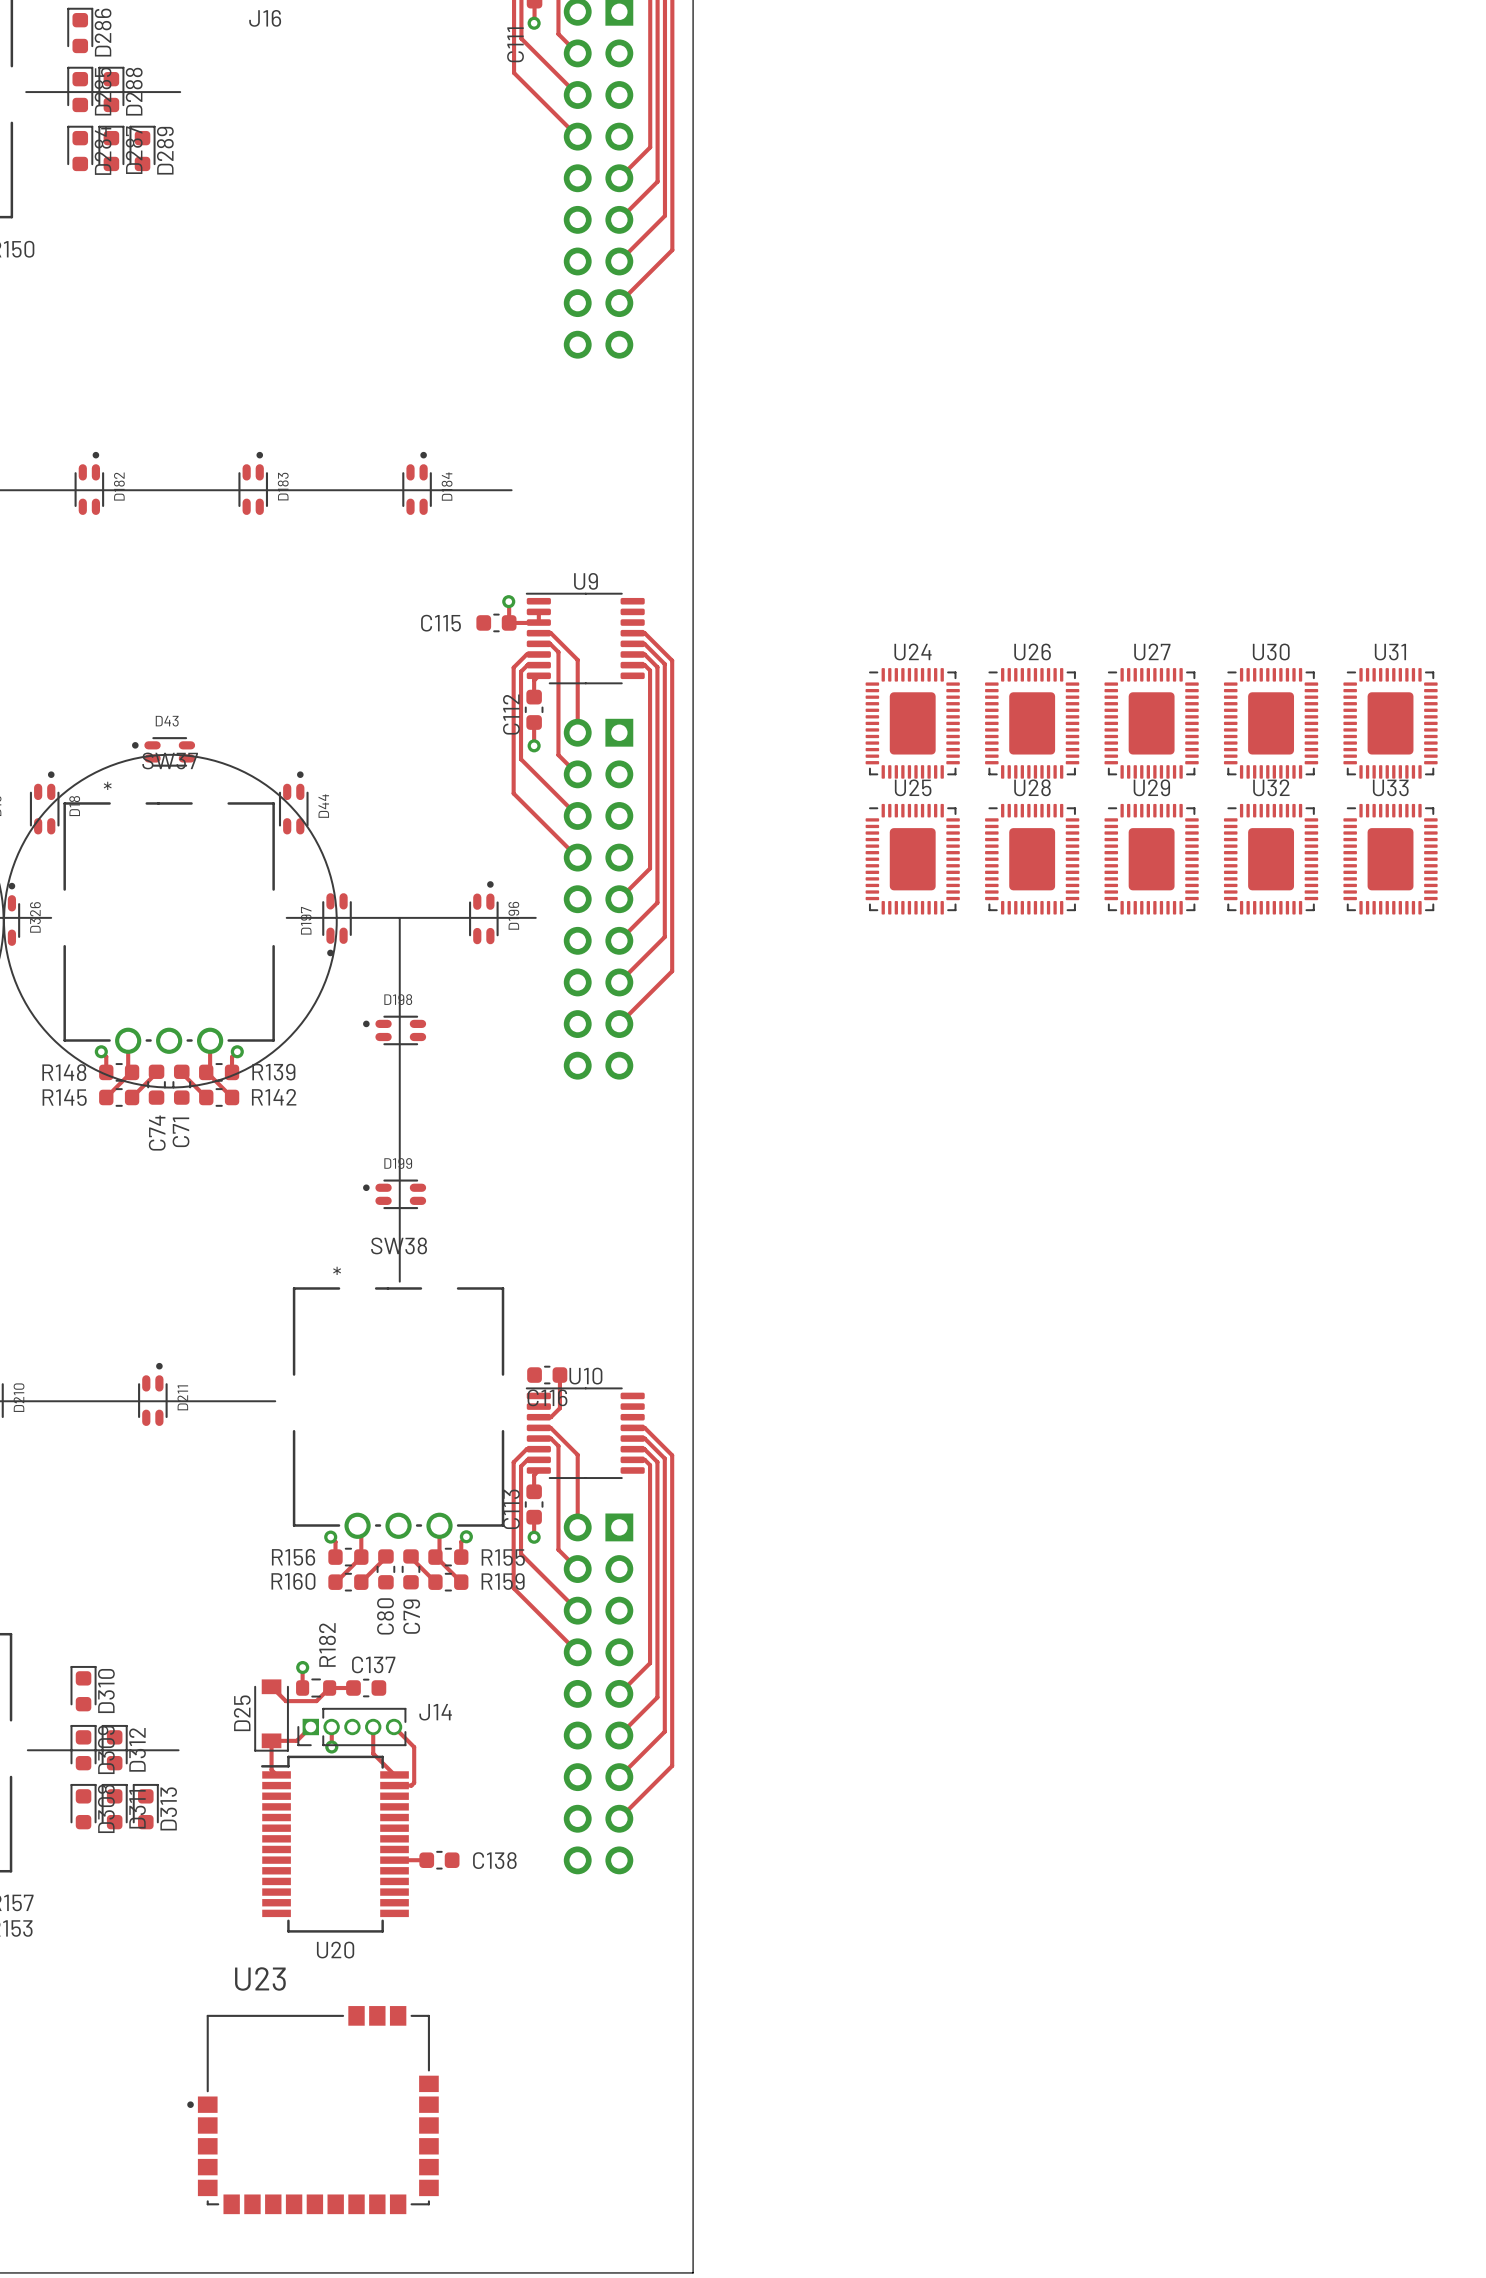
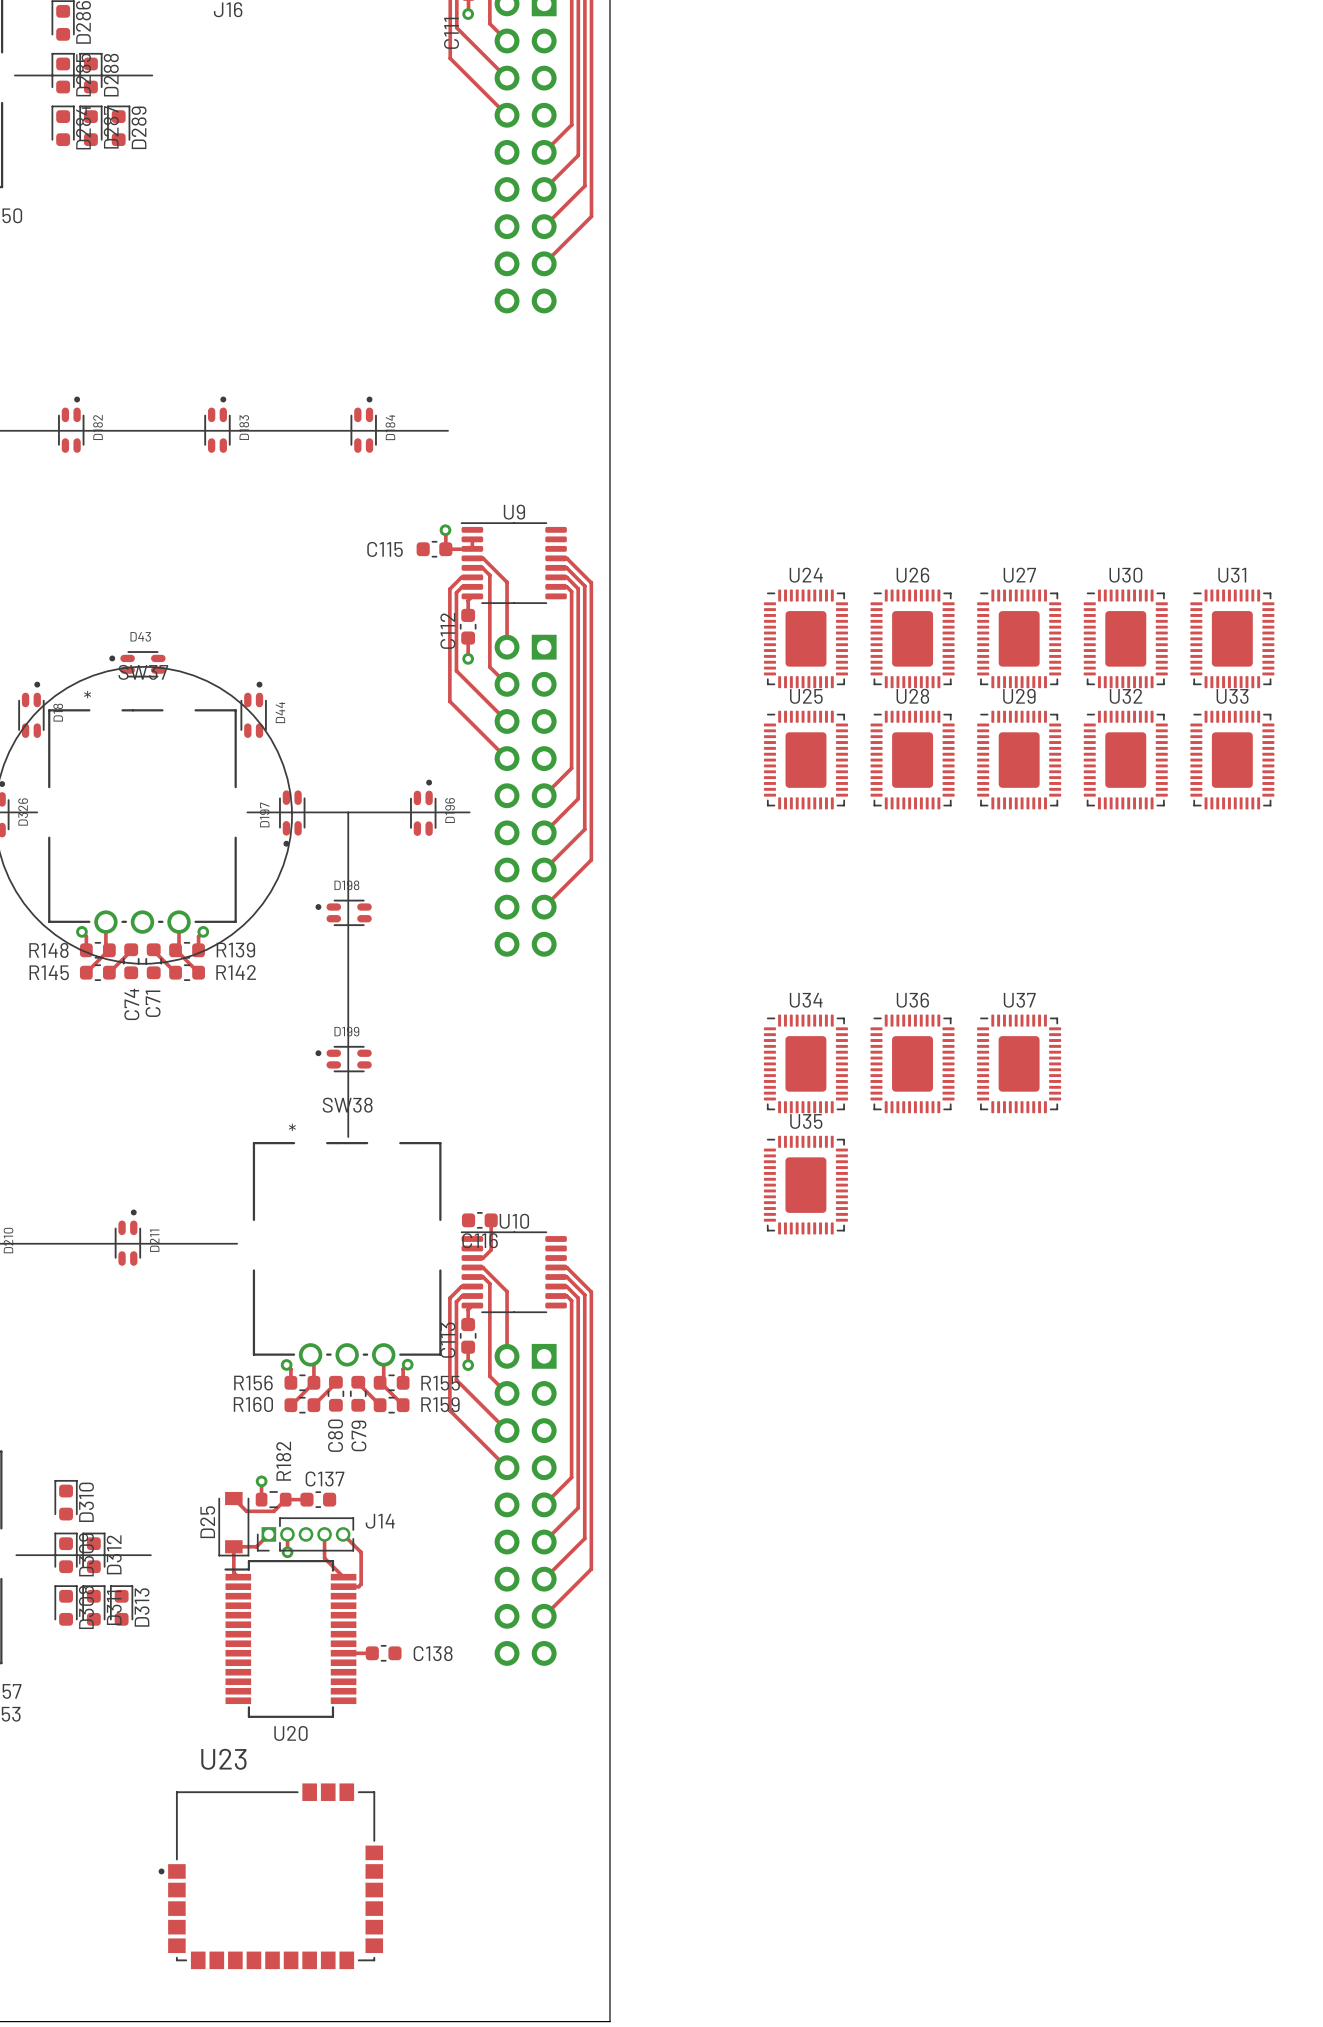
U34: none -> (805, 1063)
U36: none -> (912, 1063)
U37: none -> (1019, 1063)
U35: none -> (805, 1185)

